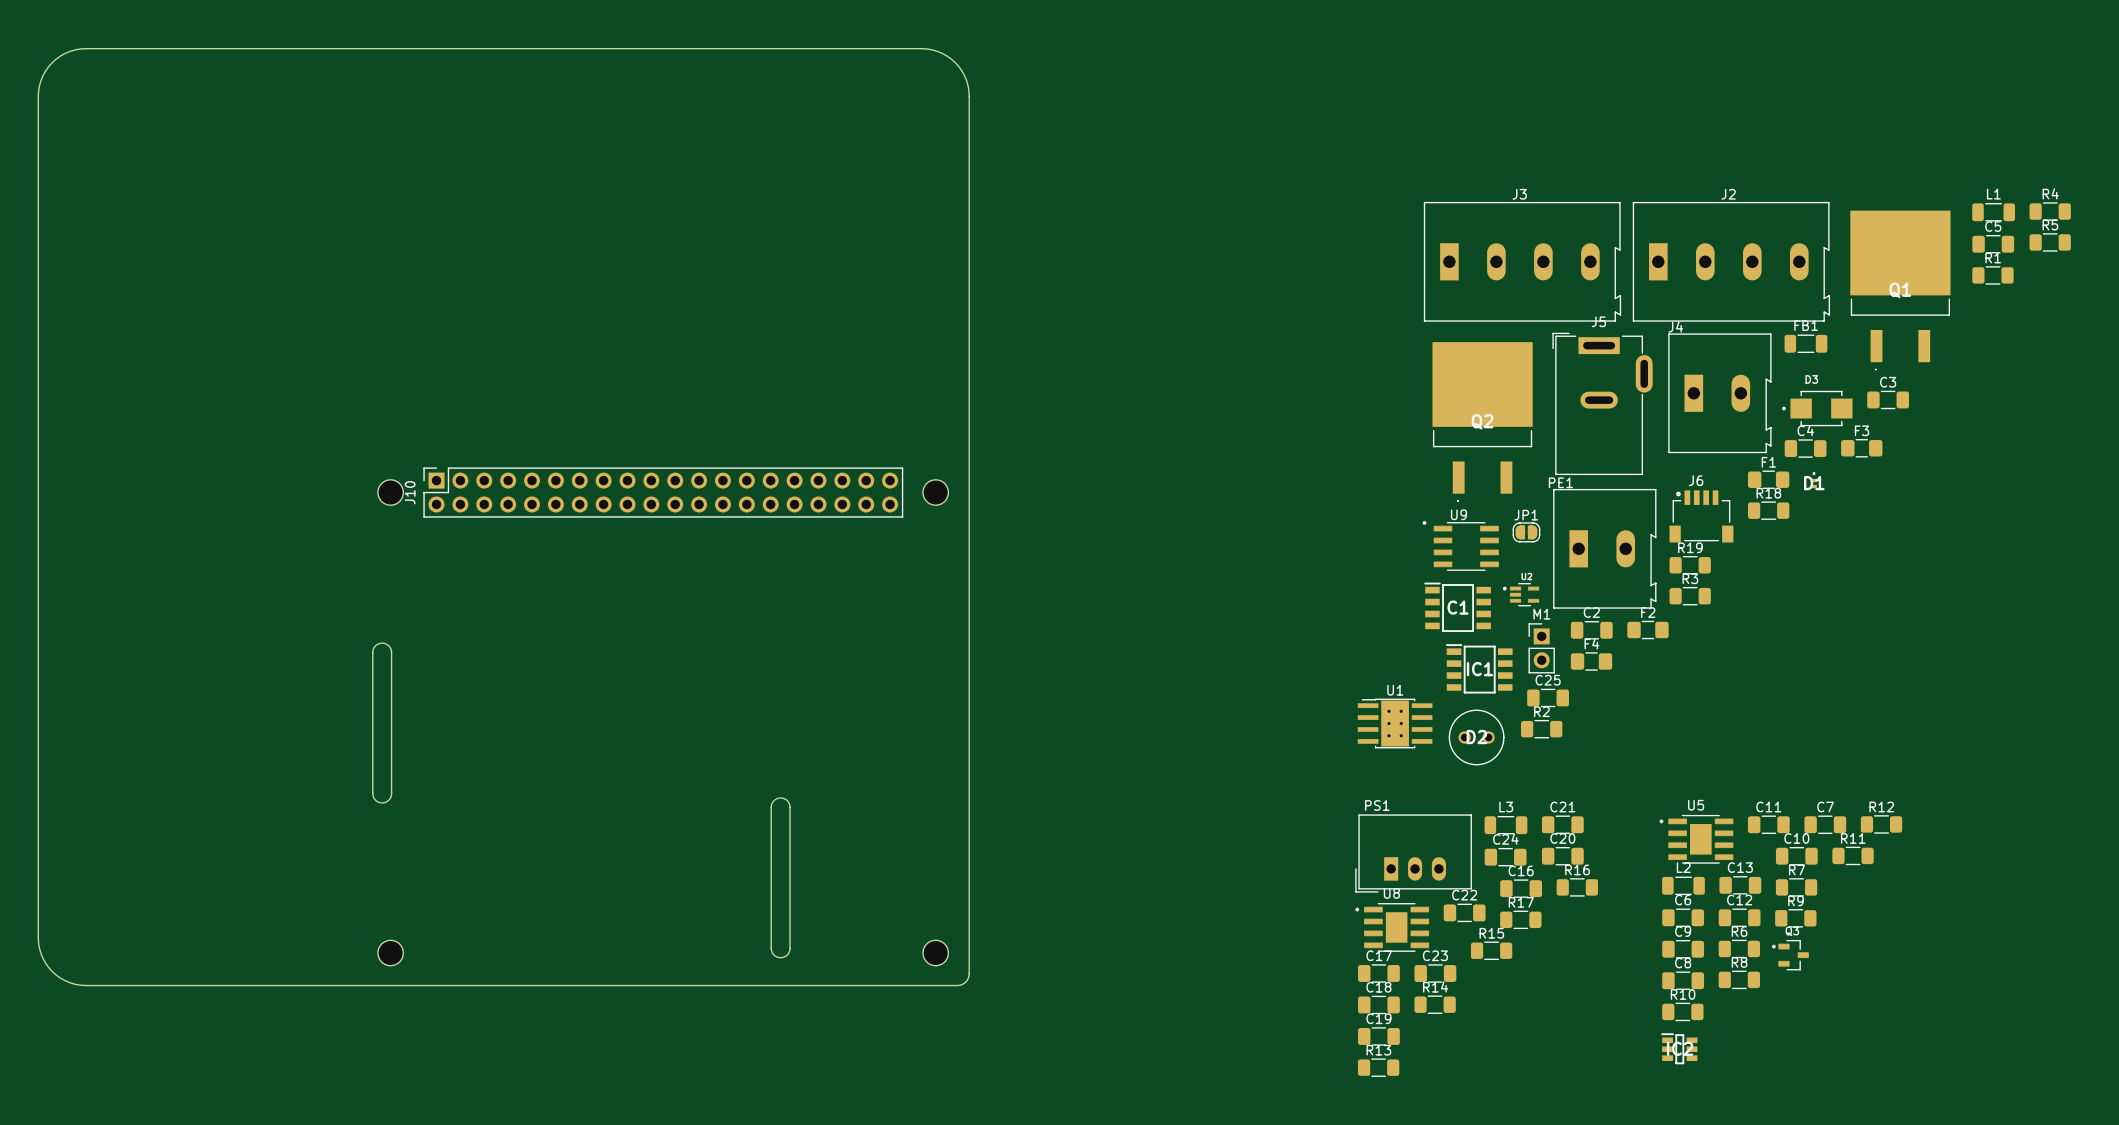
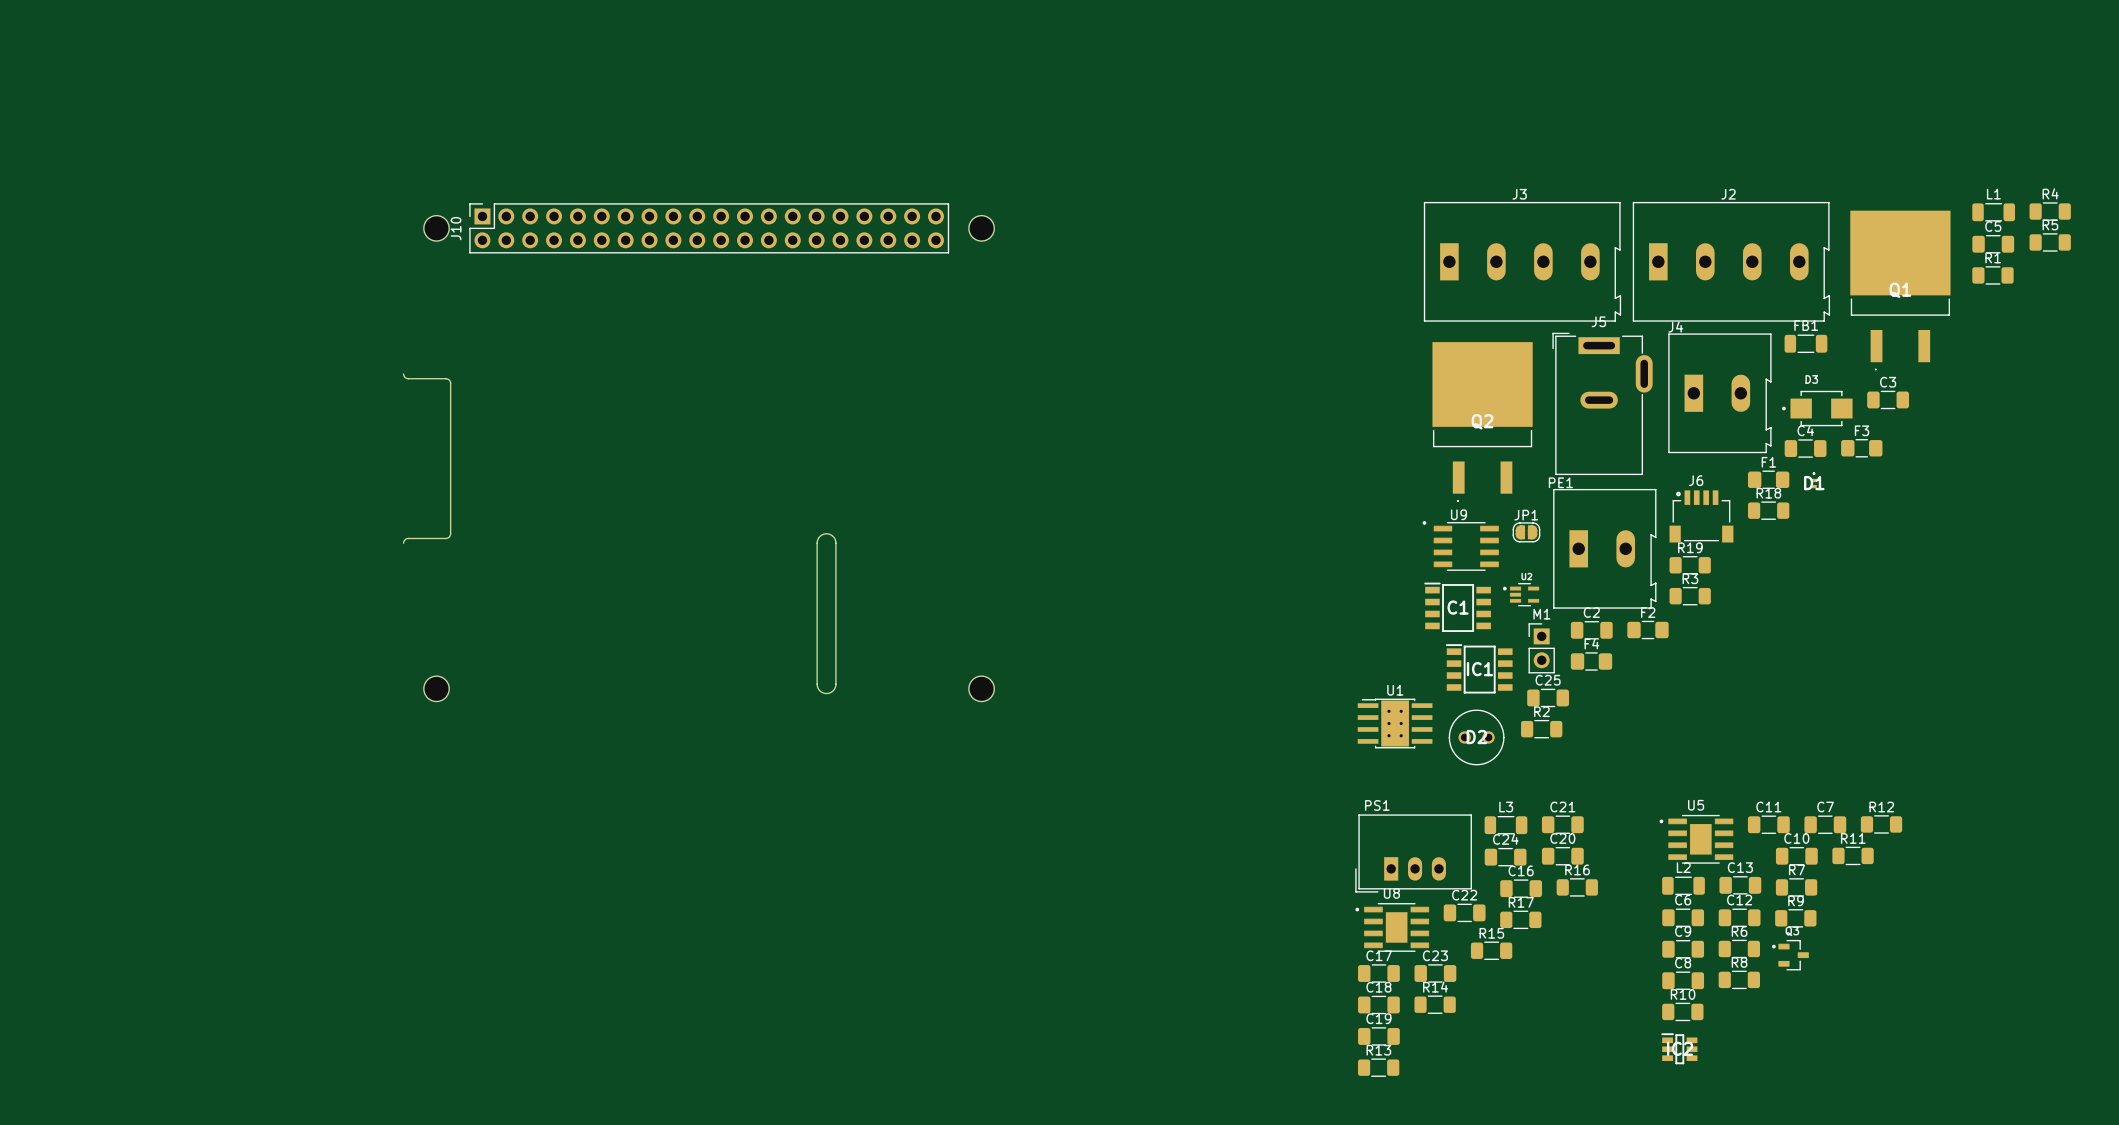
board edge: (86, 48) (921, 48) (942, 53) (955, 62) (964, 75) (969, 96) (969, 973) (965, 982) (957, 985) (86, 985) (65, 980) (52, 971) (43, 958) (38, 937) (38, 96) (43, 75) (52, 62) (65, 53) (86, 48) -> none
part: none -> (436, 228)
part: none -> (981, 228)
board edge: none -> (403, 374) (407, 378) (446, 378) (450, 383) (450, 534) (446, 538) (407, 538) (403, 543)
part: (390, 492) -> none
J10 position: (663, 492) -> (709, 228)
part: (935, 492) -> none
board edge: none -> (817, 543) (817, 685) (820, 691) (827, 693) (833, 689) (835, 684) (835, 541) (832, 535) (826, 533) (819, 536) (817, 543)
board edge: (372, 652) (372, 794) (376, 801) (383, 802) (389, 799) (391, 793) (391, 651) (387, 645) (382, 643) (375, 645) (372, 652) -> none
part: none -> (436, 688)
part: none -> (981, 688)
board edge: (771, 807) (771, 949) (774, 955) (781, 957) (788, 954) (790, 948) (789, 806) (786, 799) (780, 797) (773, 800) (771, 807) -> none
part: (390, 953) -> none
part: (935, 953) -> none

